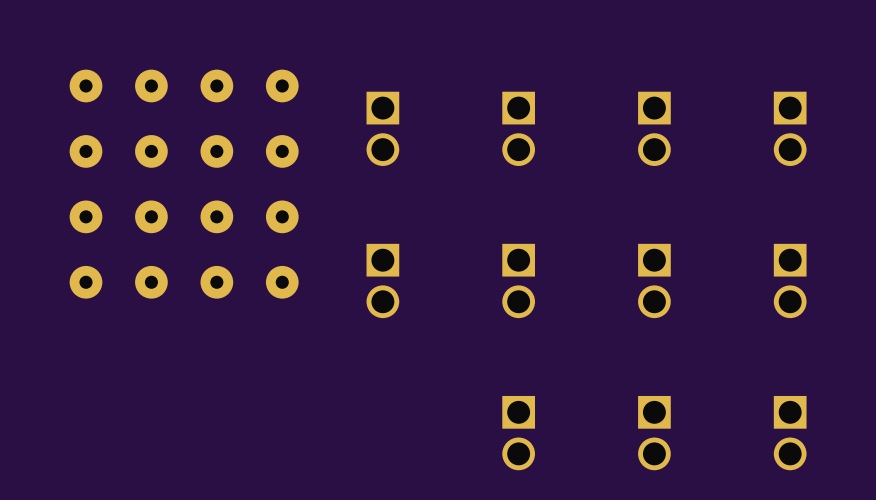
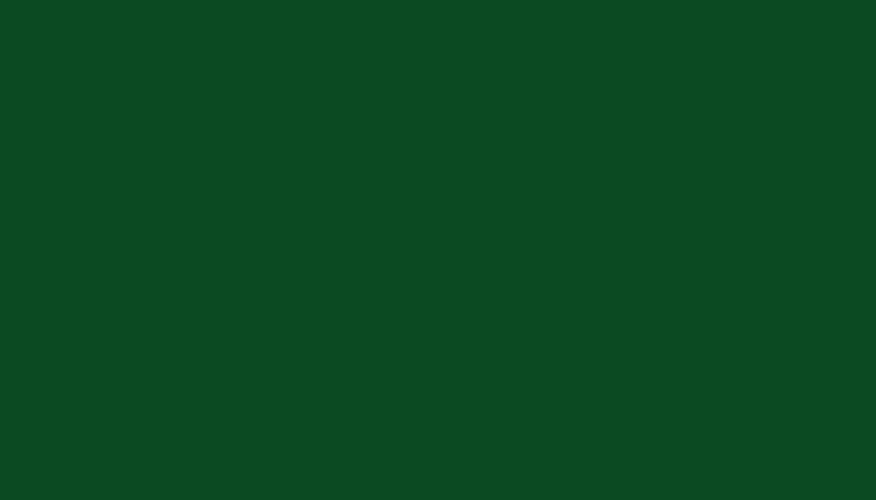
part: (85, 85) -> none
part: (151, 85) -> none
part: (216, 85) -> none
part: (282, 85) -> none
part: (382, 128) -> none
part: (518, 128) -> none
part: (654, 128) -> none
part: (790, 128) -> none
part: (85, 151) -> none
part: (151, 151) -> none
part: (216, 151) -> none
part: (282, 151) -> none
part: (85, 216) -> none
part: (151, 216) -> none
part: (216, 216) -> none
part: (282, 216) -> none
part: (382, 280) -> none
part: (518, 280) -> none
part: (654, 280) -> none
part: (790, 280) -> none
part: (85, 282) -> none
part: (151, 282) -> none
part: (216, 282) -> none
part: (282, 282) -> none
part: (518, 433) -> none
part: (654, 433) -> none
part: (790, 433) -> none

